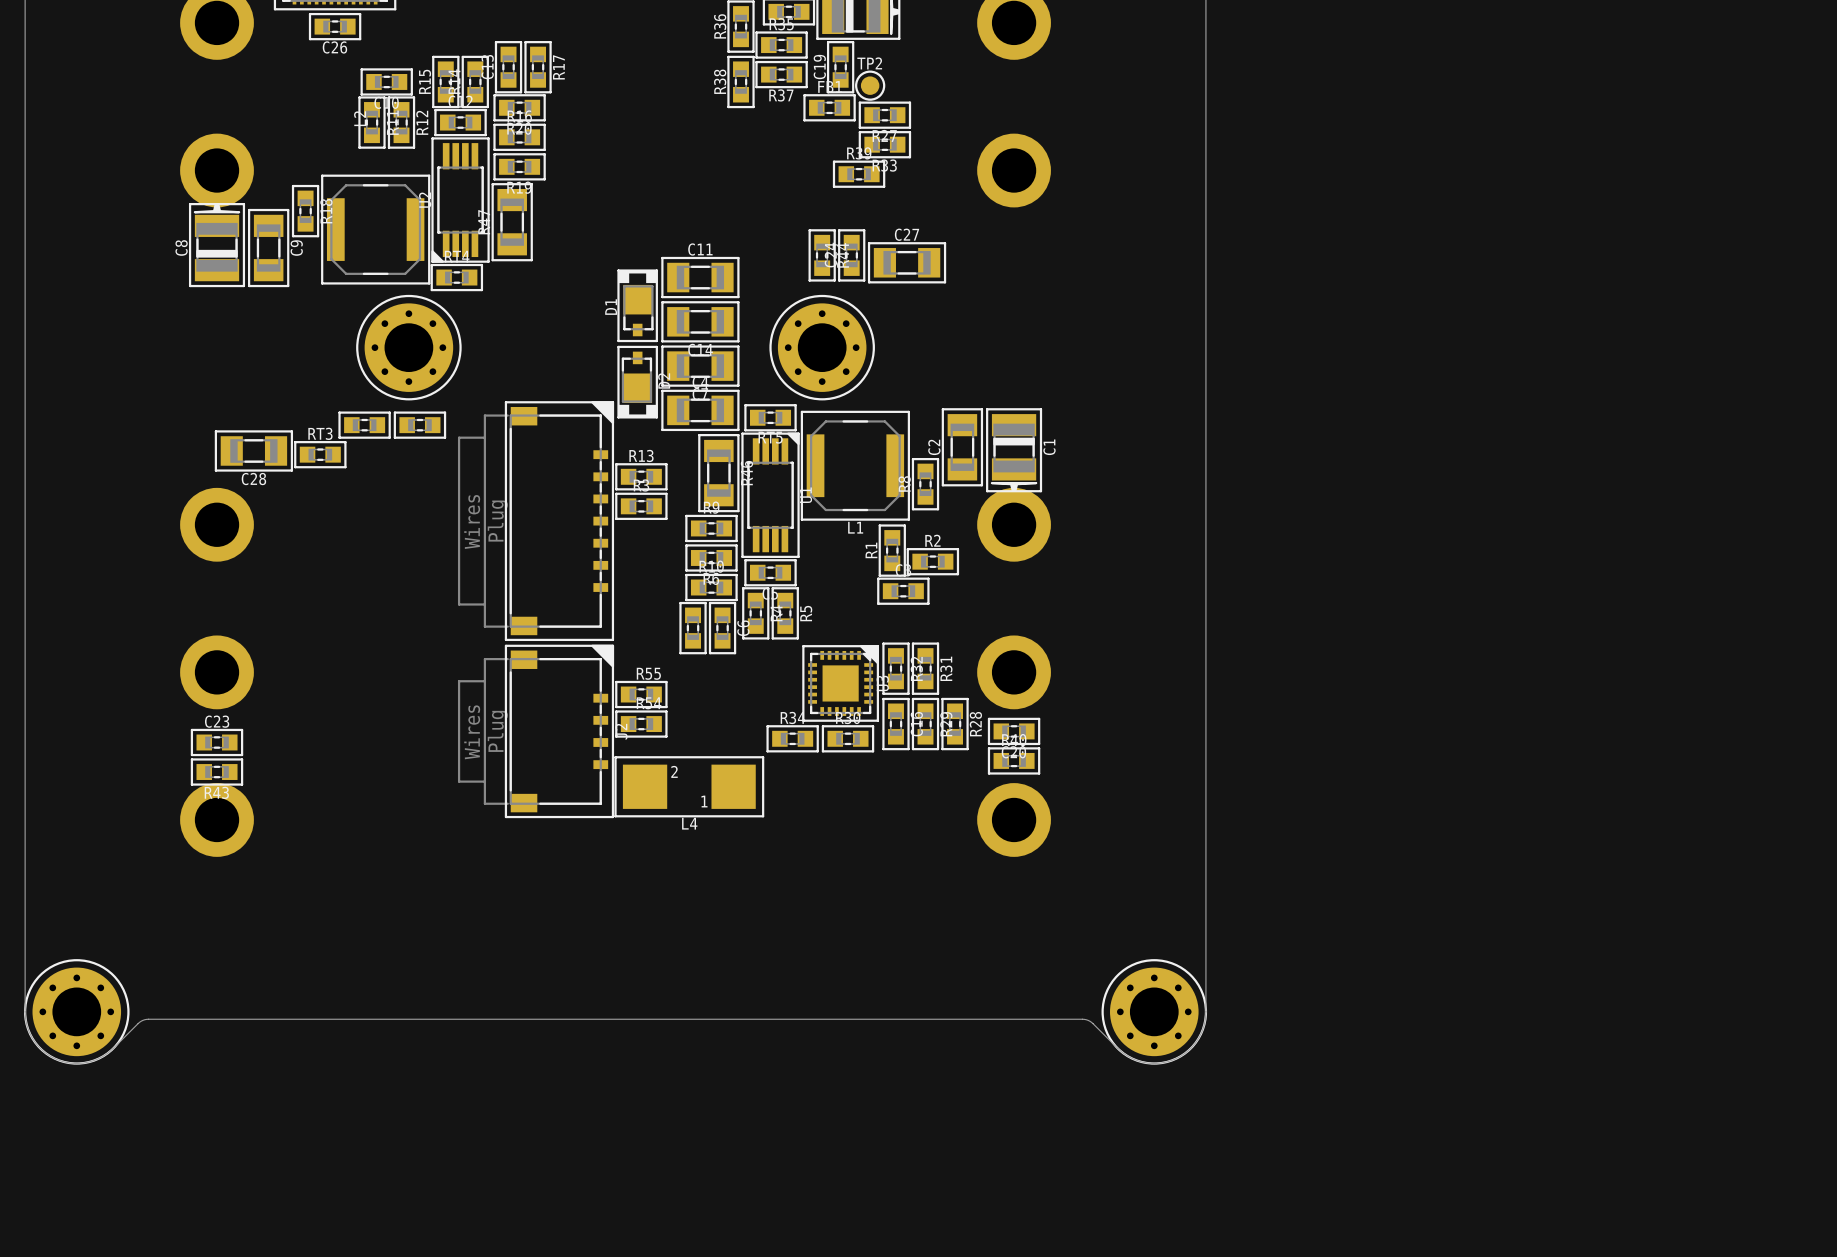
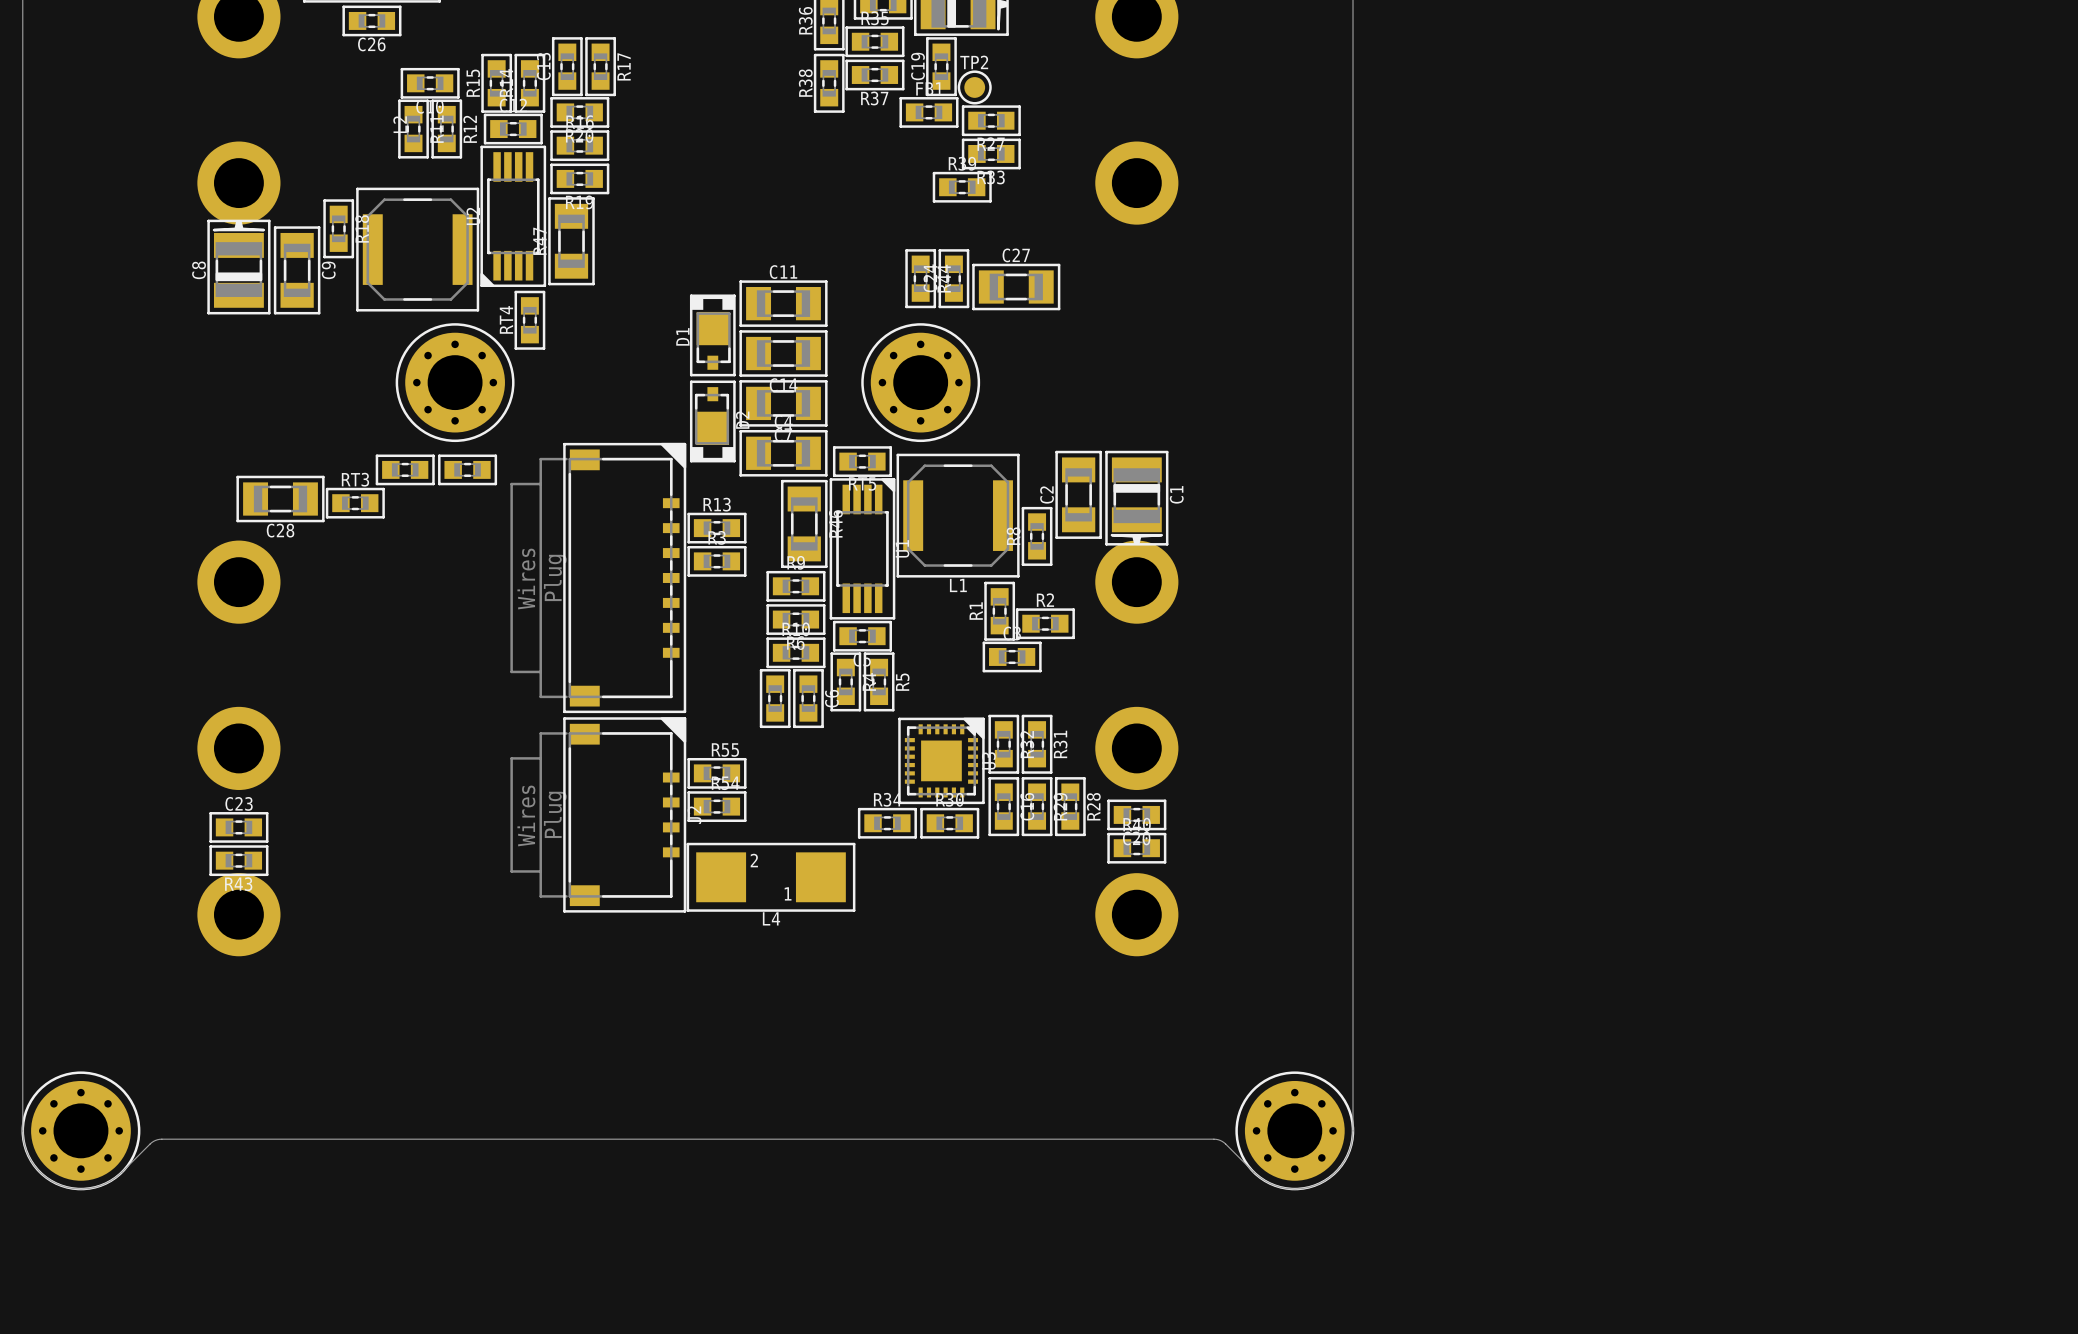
RT4 rotation: 0° (456, 277) -> 90° clockwise (529, 320)

